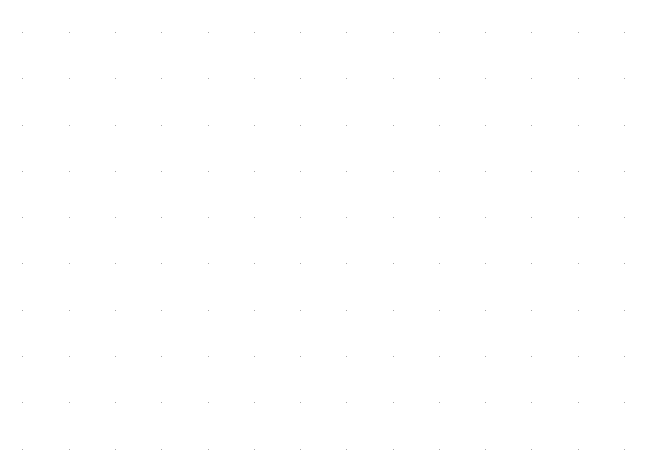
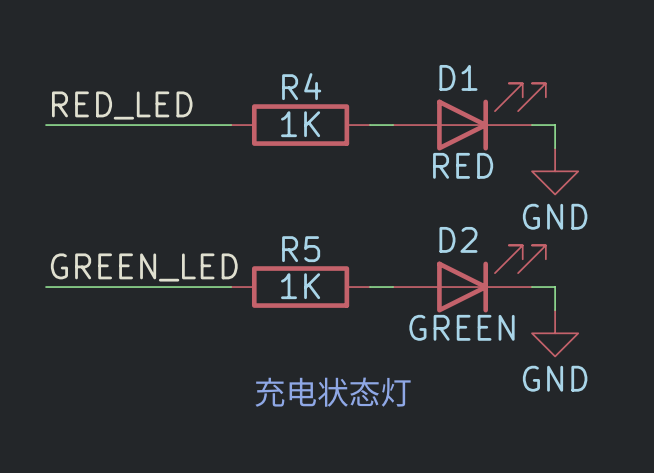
label: none -> RED_LED (122, 105)
D1: none -> RED (469, 116)
wire: none -> (46, 125) (231, 125)
R4: none -> 1K (300, 125)
wire: none -> (369, 125) (393, 125)
wire: none -> (531, 125) (555, 125) (555, 148)
power symbol: none -> GND (555, 171)
label: none -> GREEN_LED (144, 267)
D2: none -> GREEN (469, 278)
wire: none -> (46, 287) (231, 287)
R5: none -> 1K (300, 287)
wire: none -> (369, 287) (393, 287)
wire: none -> (531, 287) (555, 287) (555, 310)
power symbol: none -> GND (555, 333)
text: none -> 充电状态灯 (333, 392)

